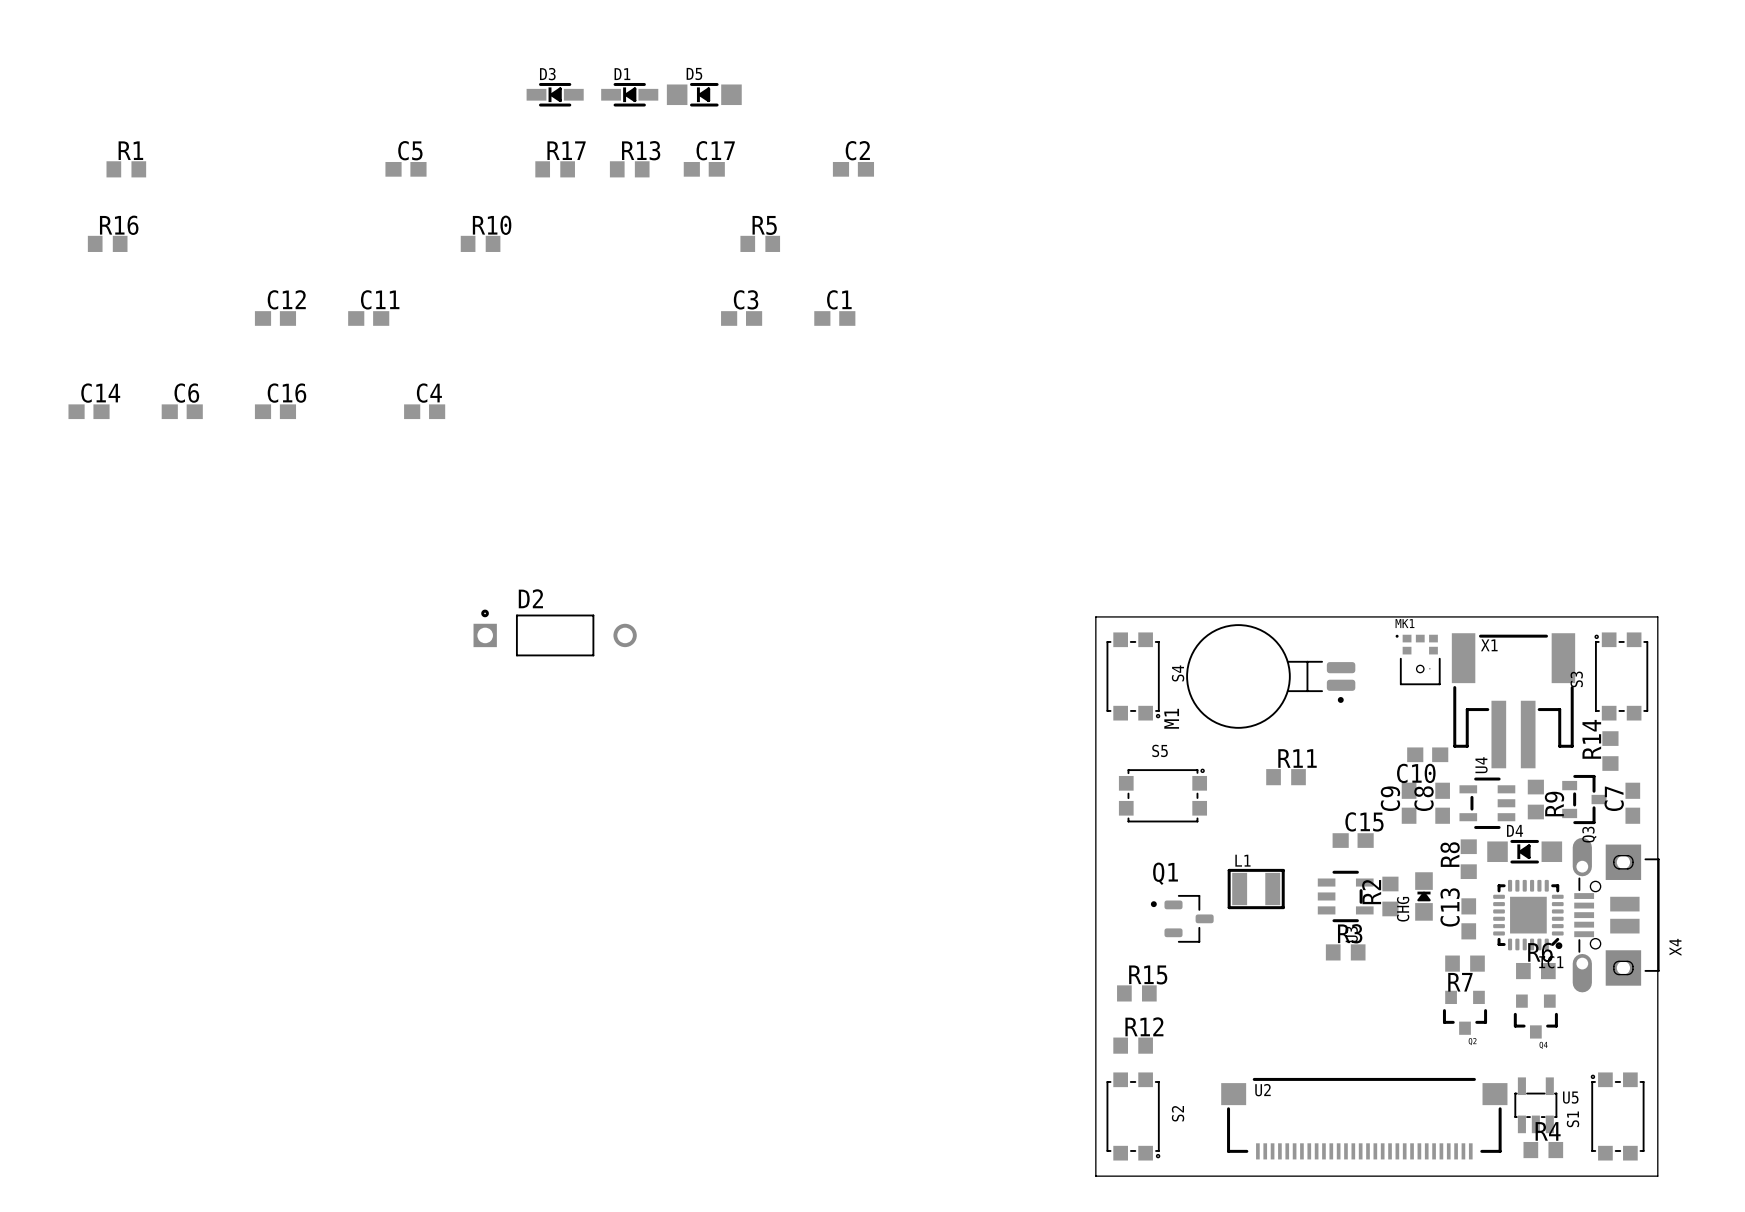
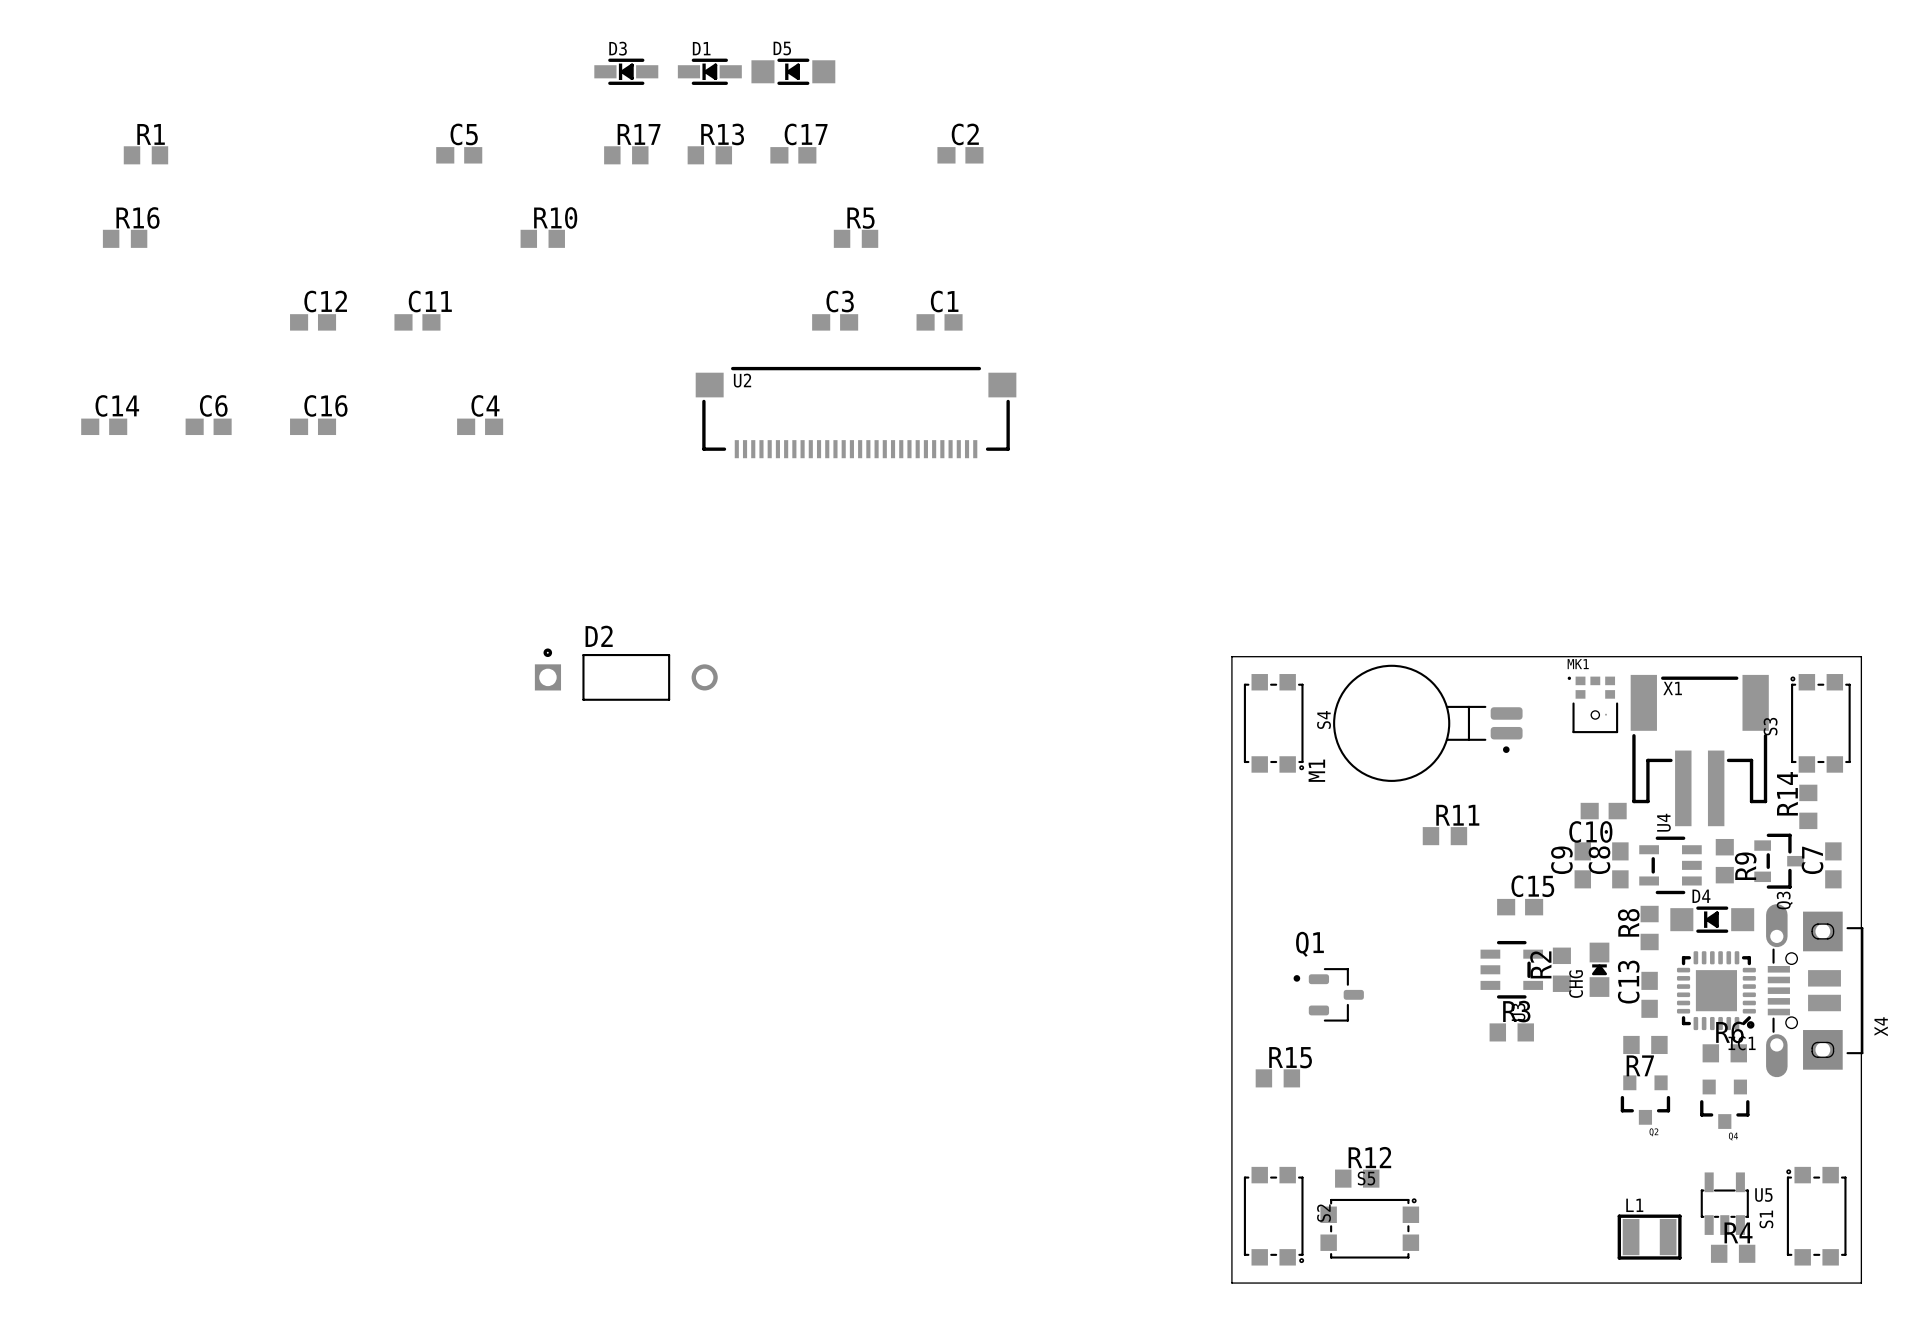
S5 position: (1162, 795) -> (1369, 1228)
L1 position: (1256, 889) -> (1649, 1237)
R12 position: (1133, 1045) -> (1357, 1178)
U2 position: (1364, 1118) -> (856, 412)

